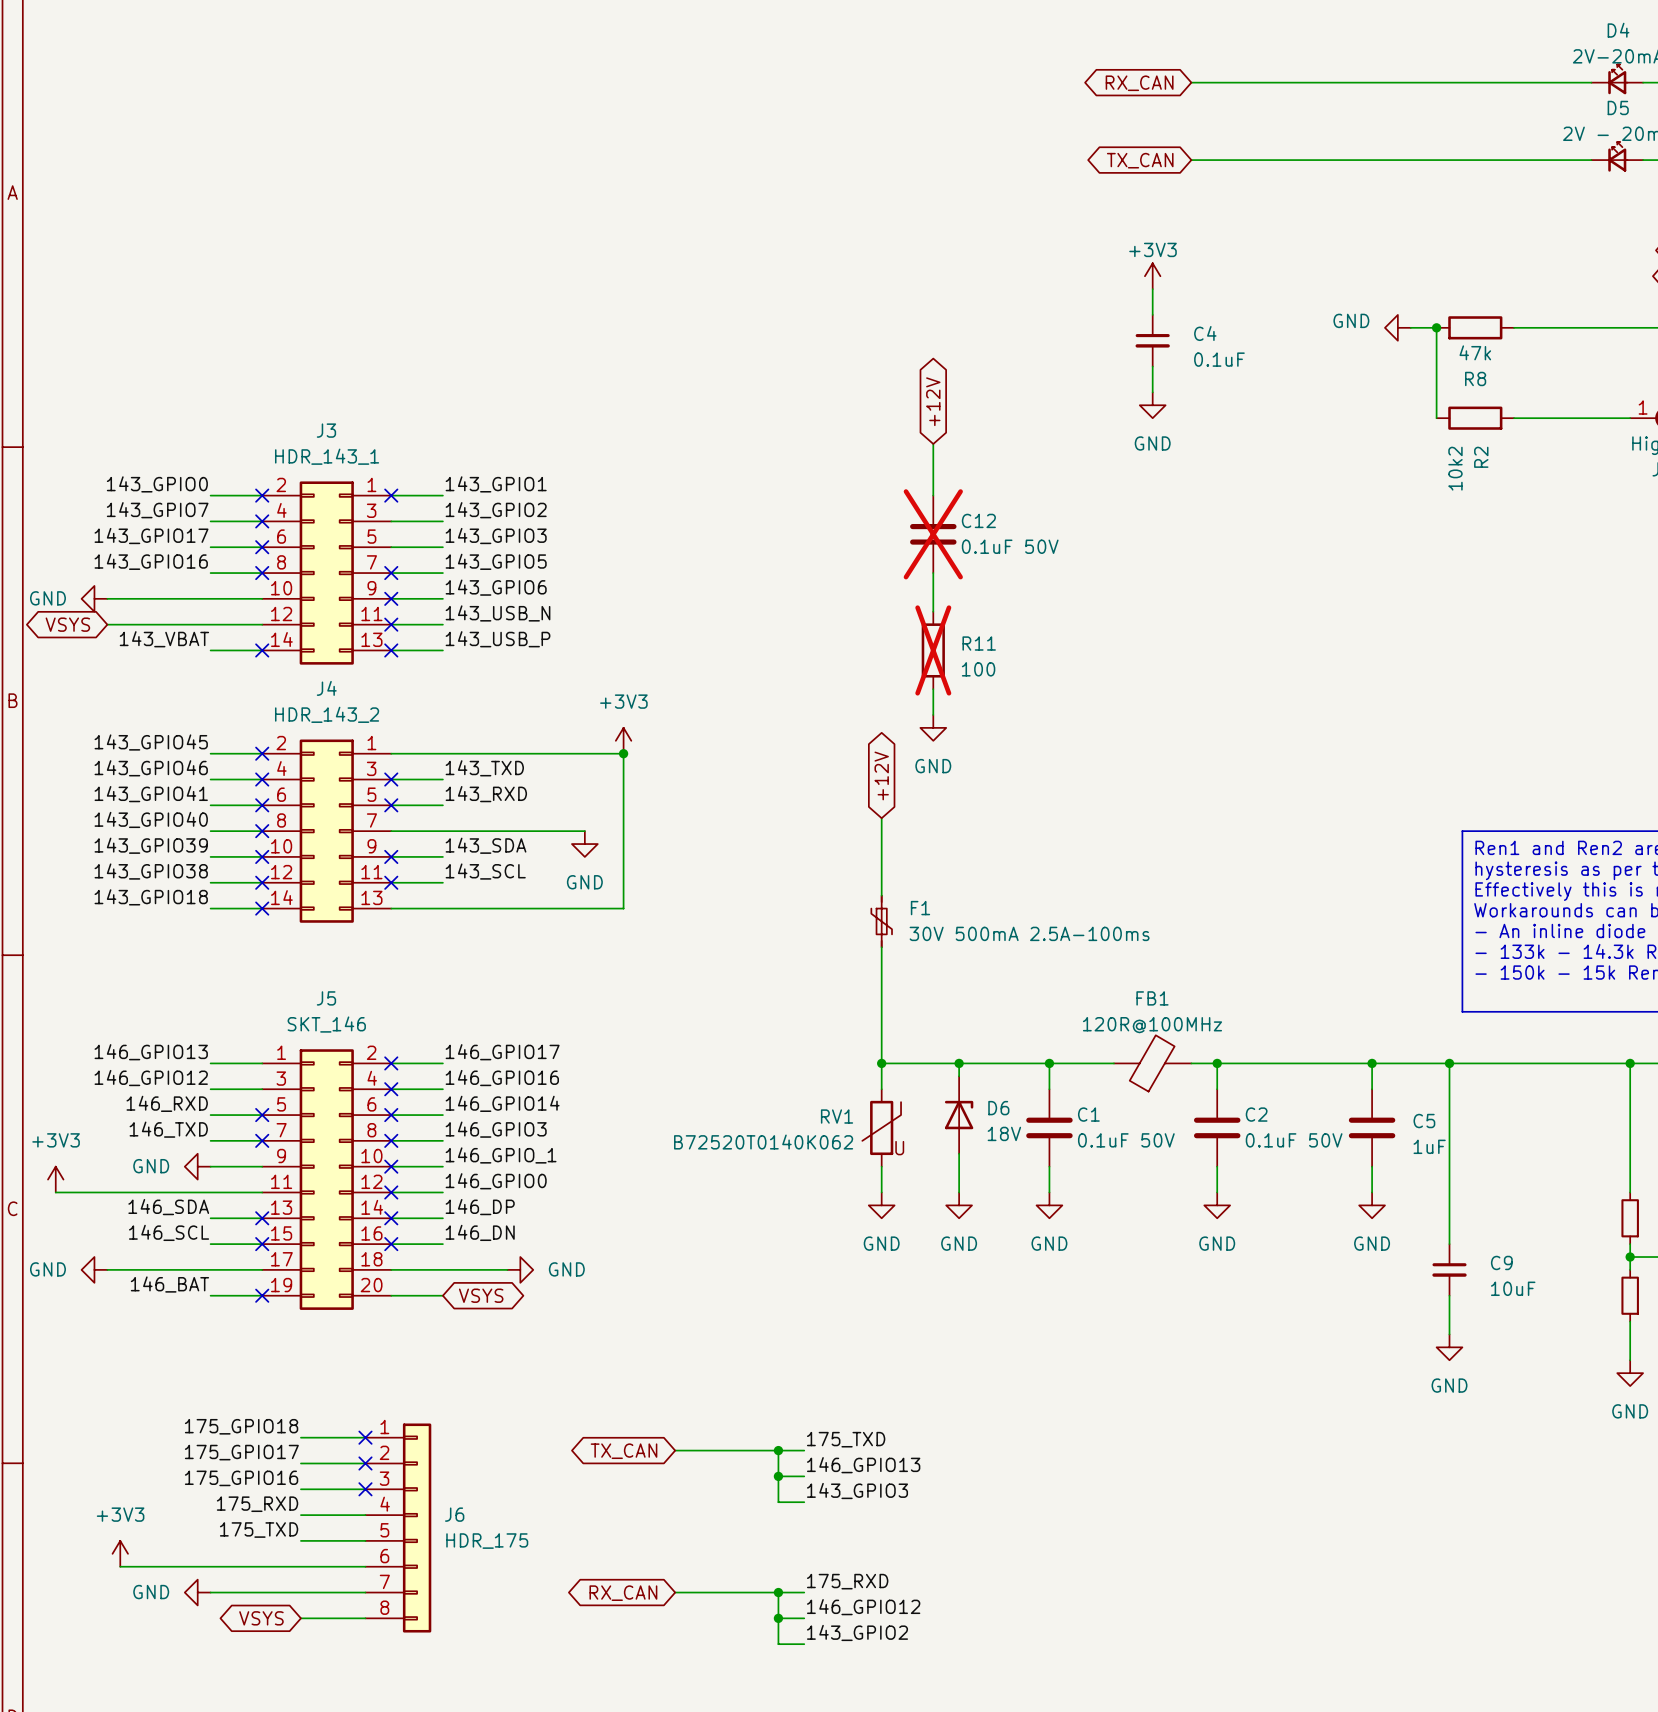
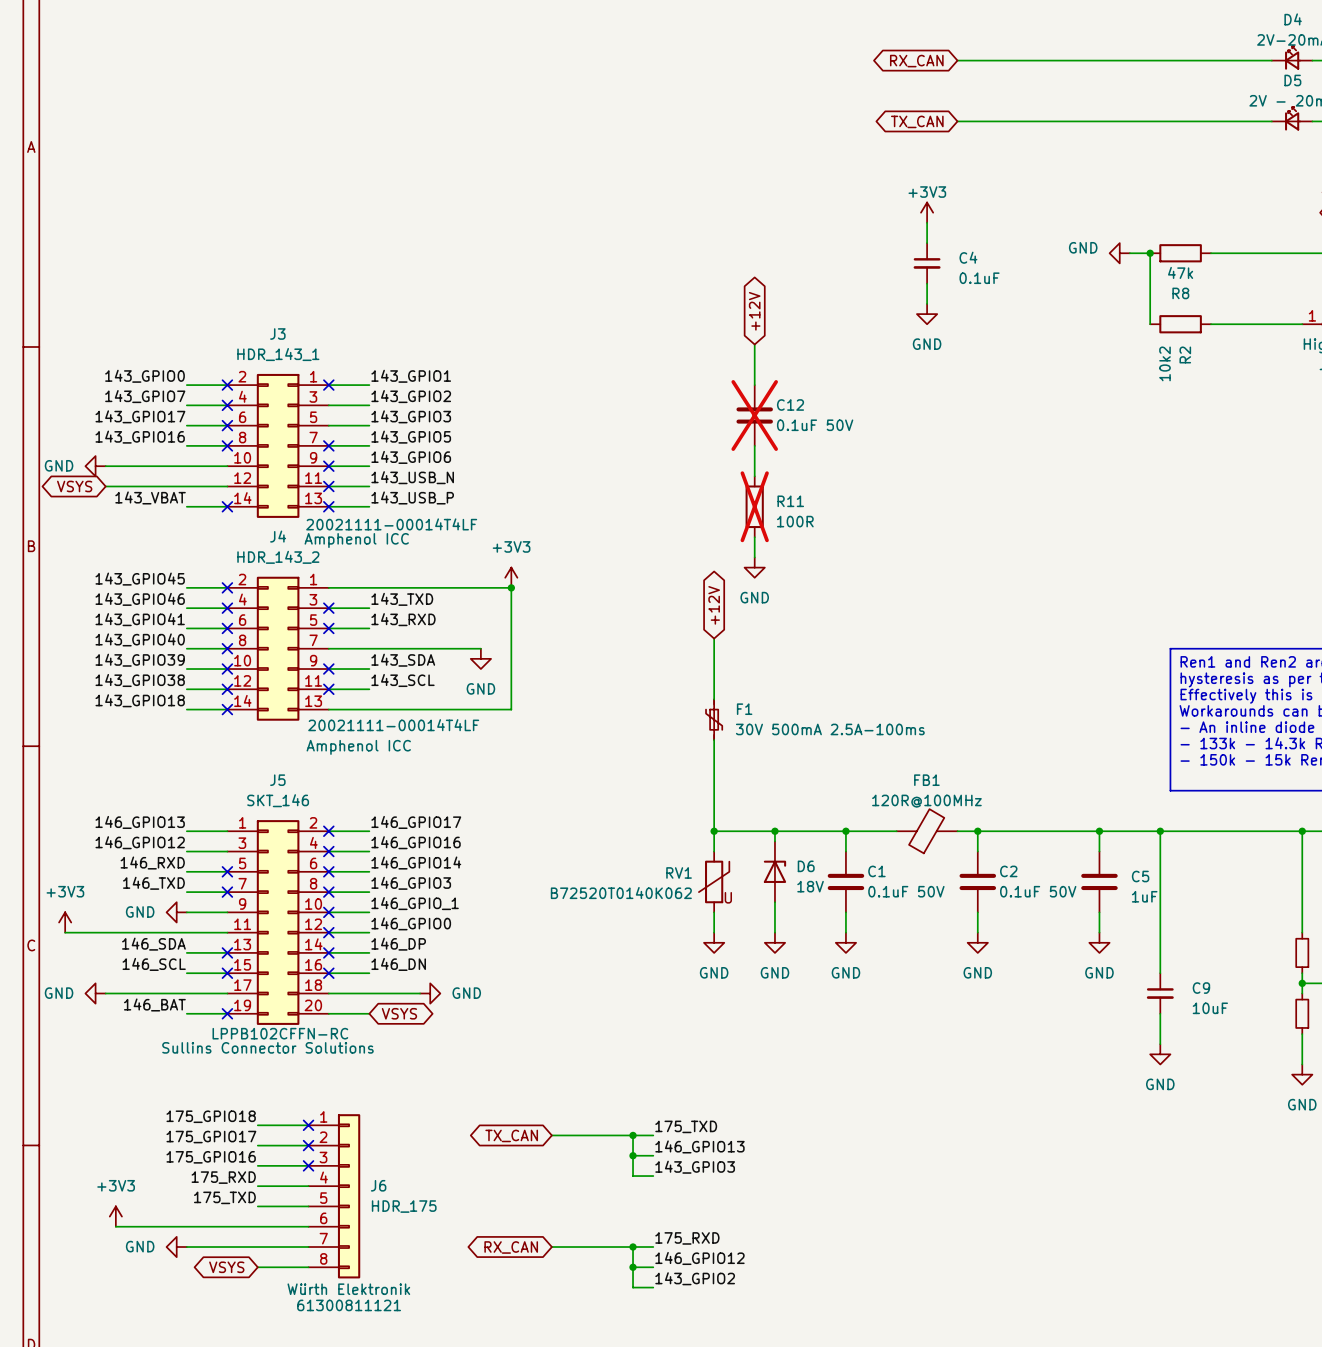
R11 value: 100 (978, 669) -> 100R (795, 521)
J3 text: none -> 20021111-00014T4LF (391, 524)
J3 text: none -> Amphenol ICC (356, 540)
J4 text: none -> 20021111-00014T4LF (393, 725)
J4 text: none -> Amphenol ICC (358, 747)
J5 text: none -> LPPB102CFFN-RC (280, 1033)
J5 text: none -> Sullins Connector Solutions (267, 1047)
J6 text: none -> Würth Elektronik (348, 1289)
J6 text: none -> 61300811121 (349, 1305)

